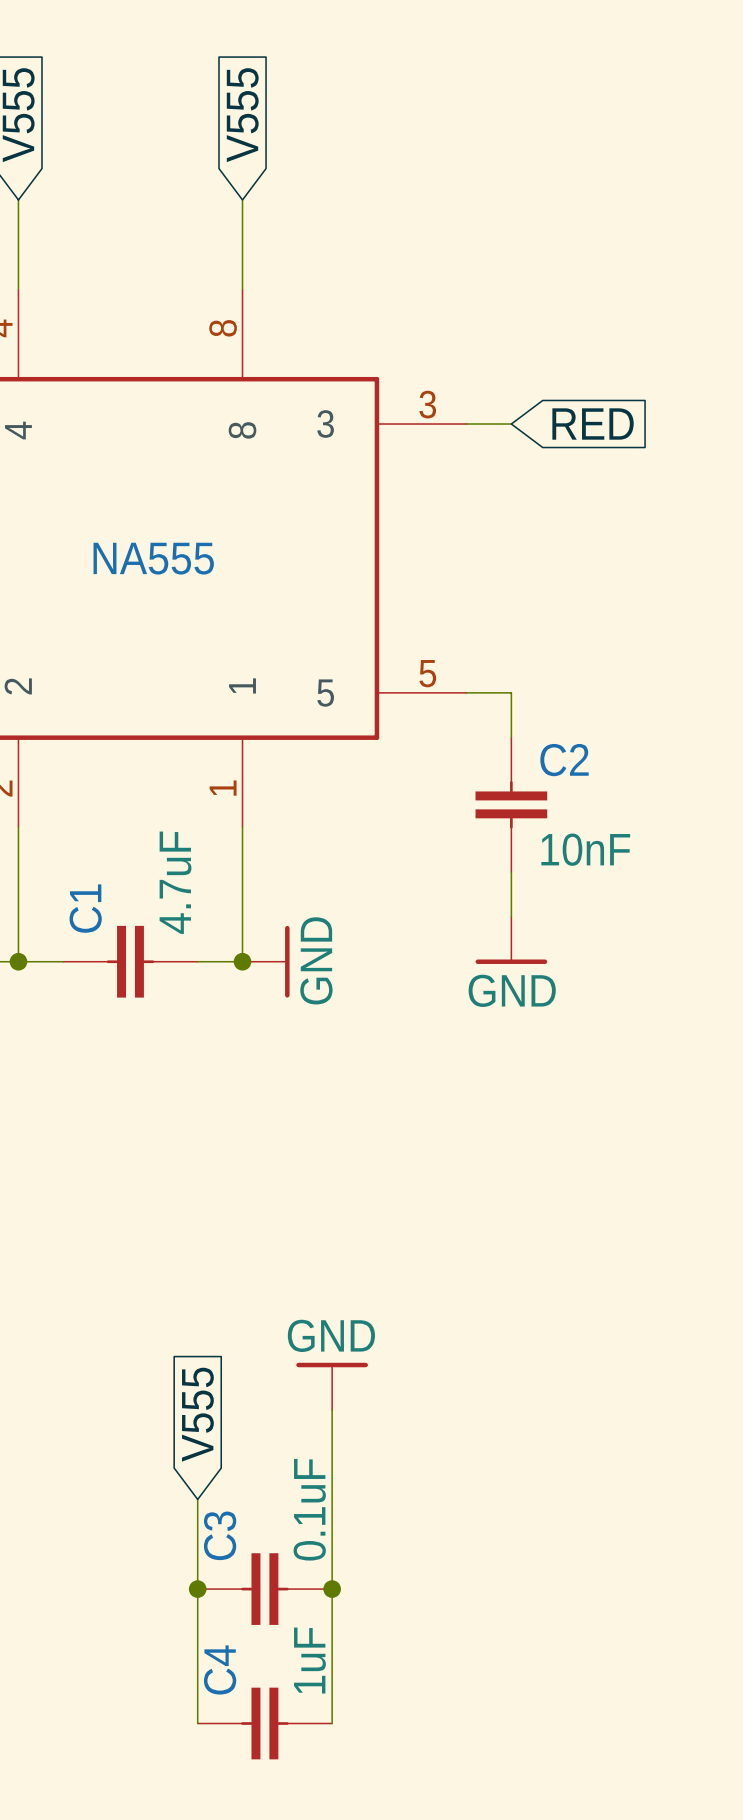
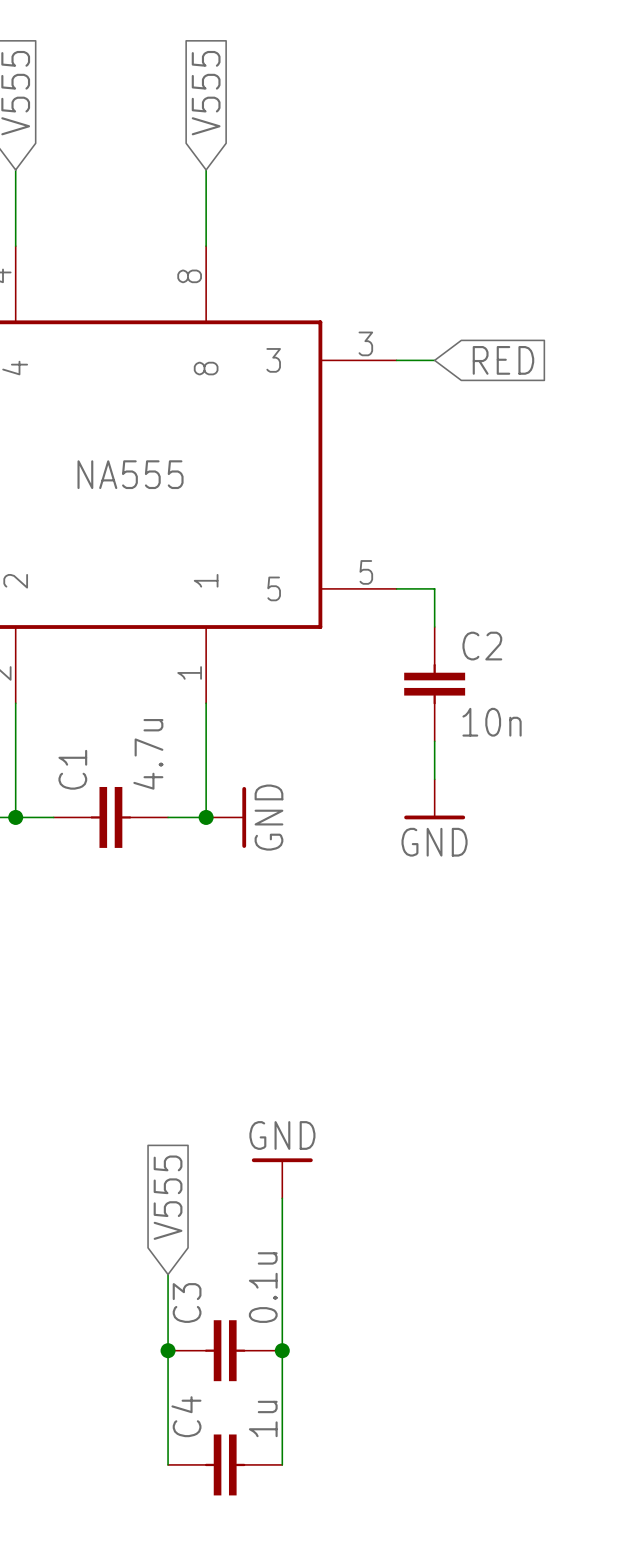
C2 value: 10nF (585, 849) -> 10n (492, 722)
C1 value: 4.7uF (175, 882) -> 4.7u (148, 754)
C3 value: 0.1uF (309, 1509) -> 0.1u (263, 1287)
C4 value: 1uF (309, 1660) -> 1u (263, 1418)

